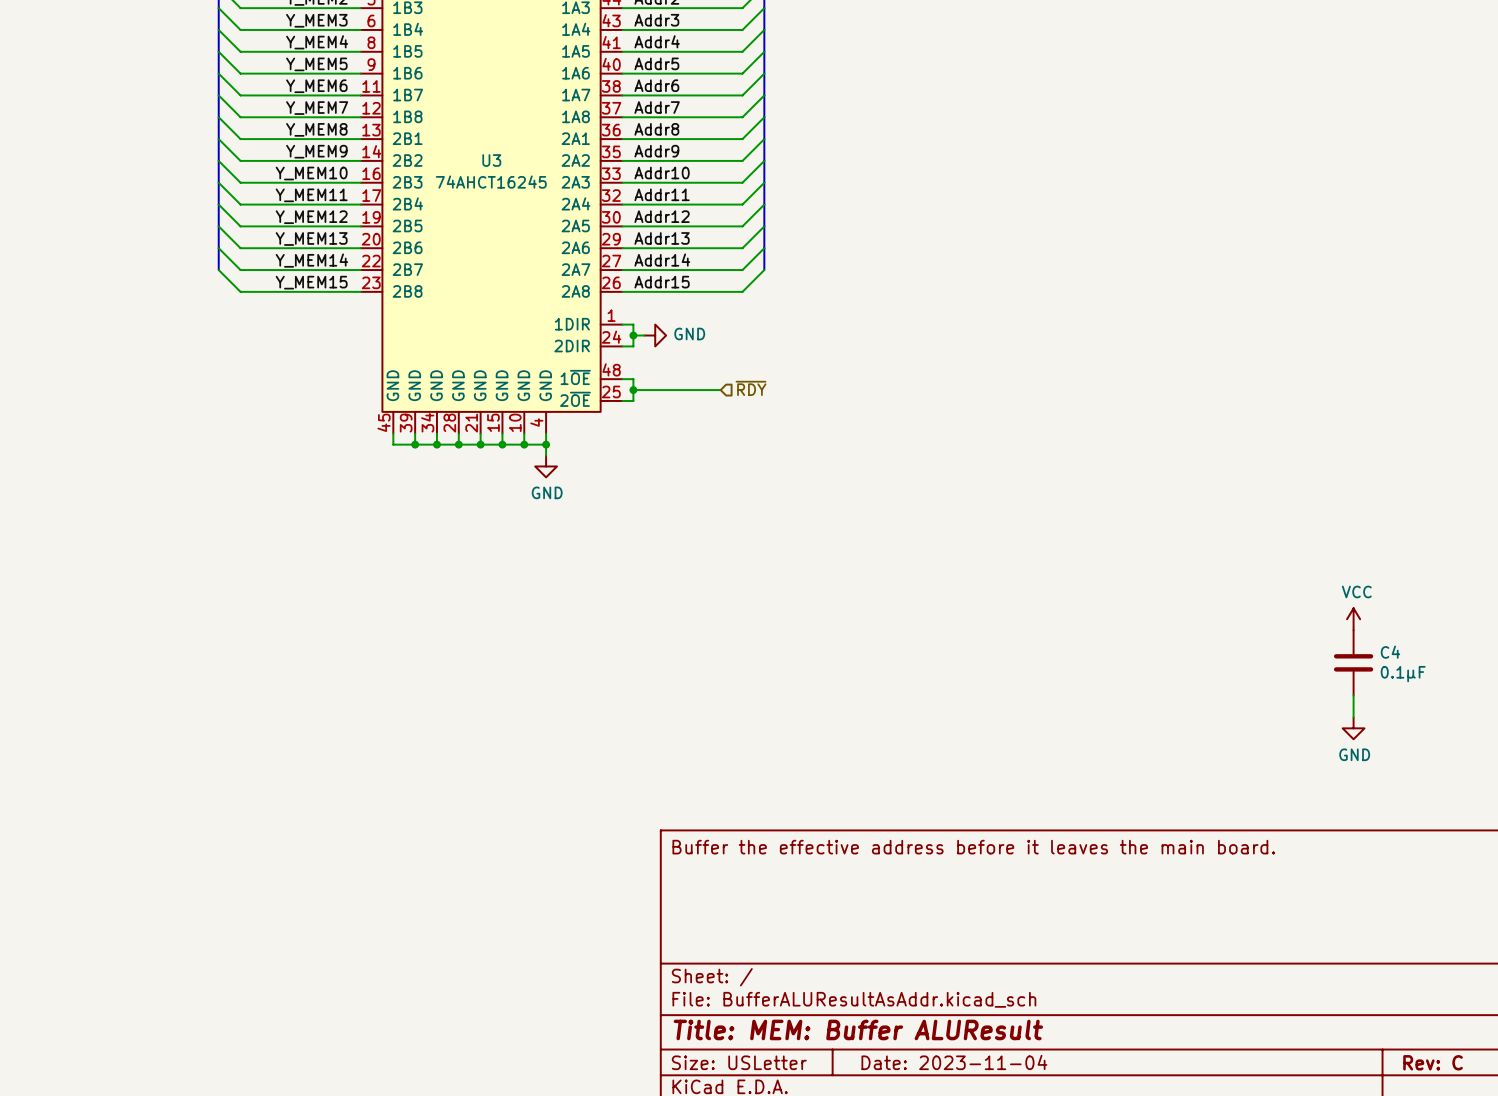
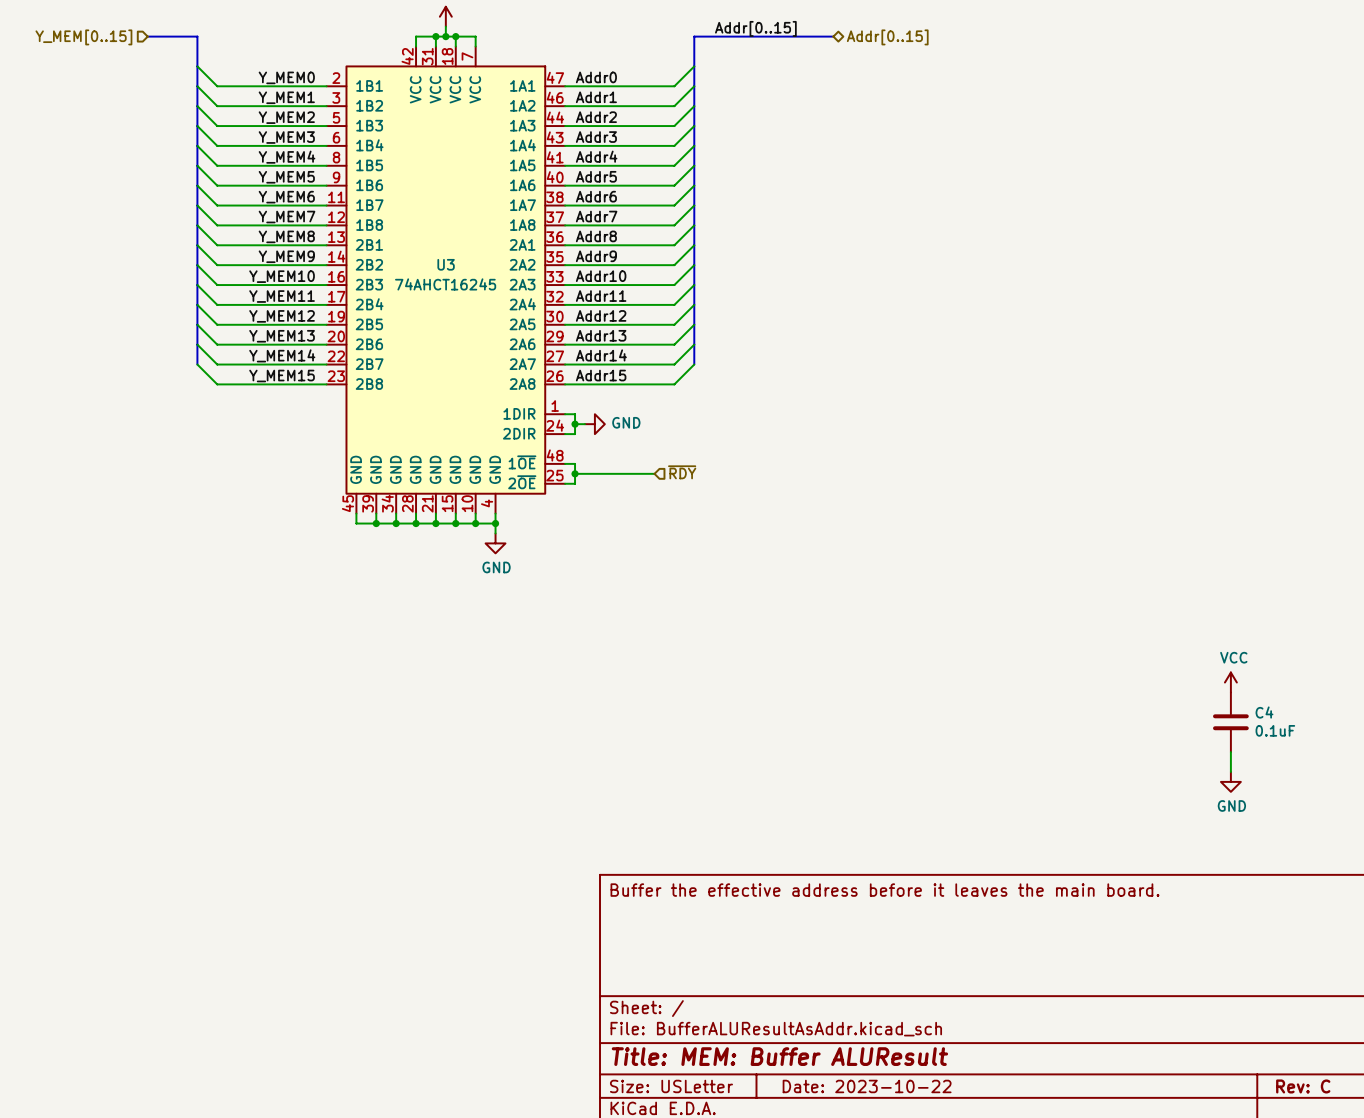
C4 value: 0.1μF (1403, 674) -> 0.1uF (1275, 730)
title block: Date: 2023-11-04 (954, 1062) -> Date: 2023-10-22 (867, 1086)

